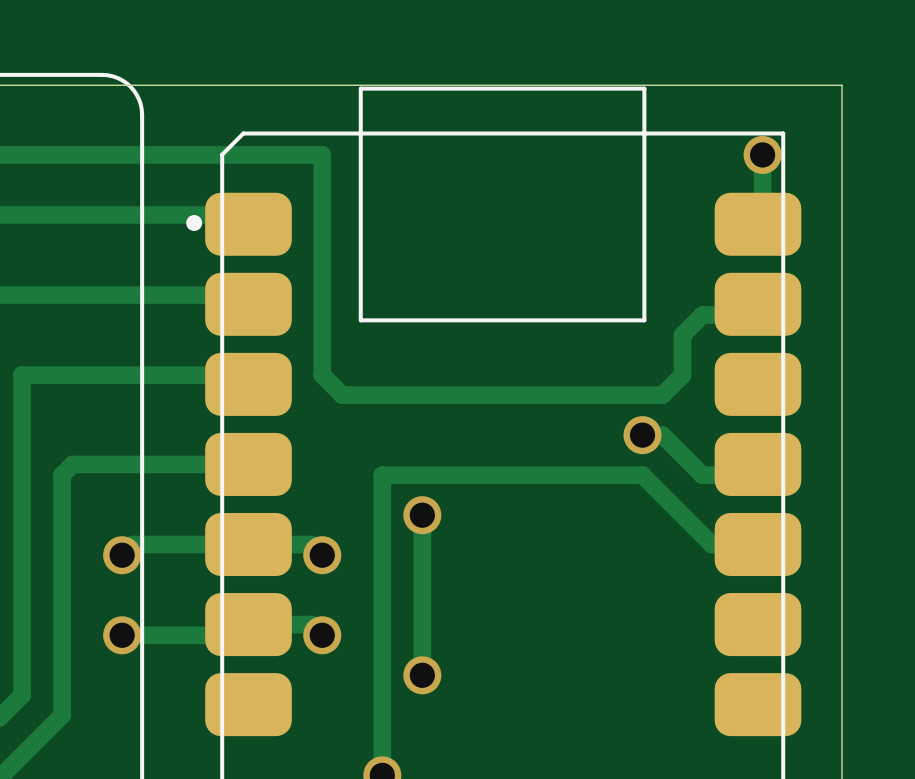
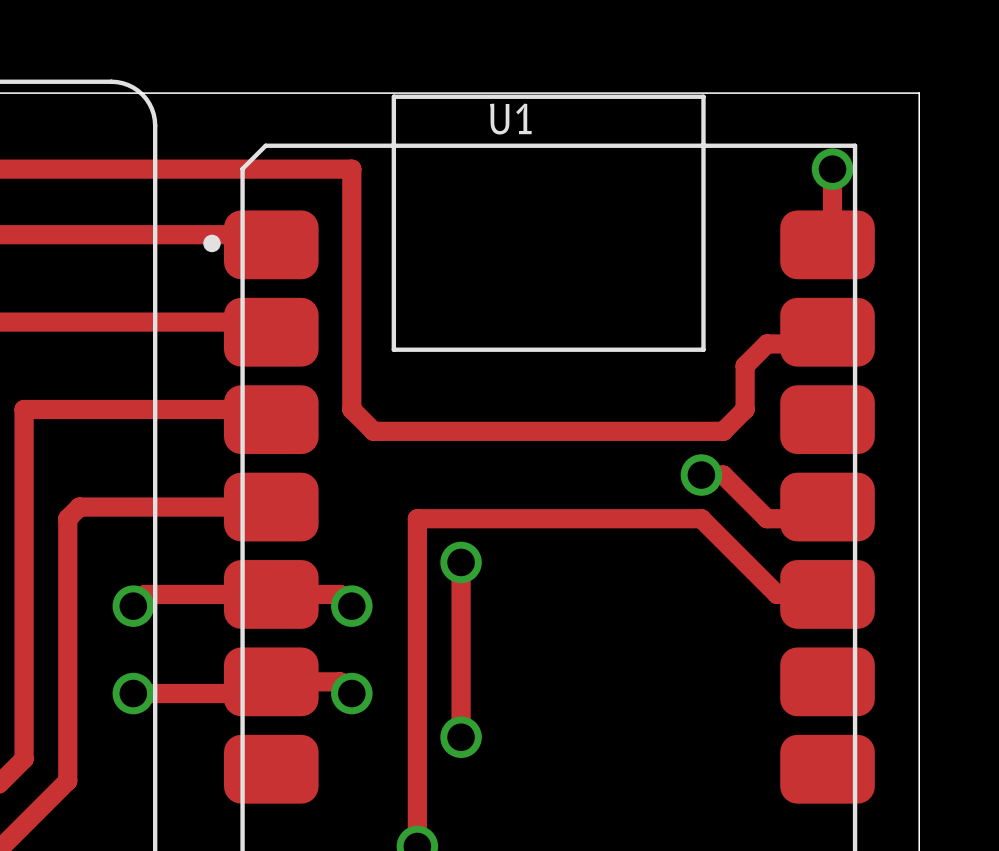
U1 name: none -> U1 (510, 119)

